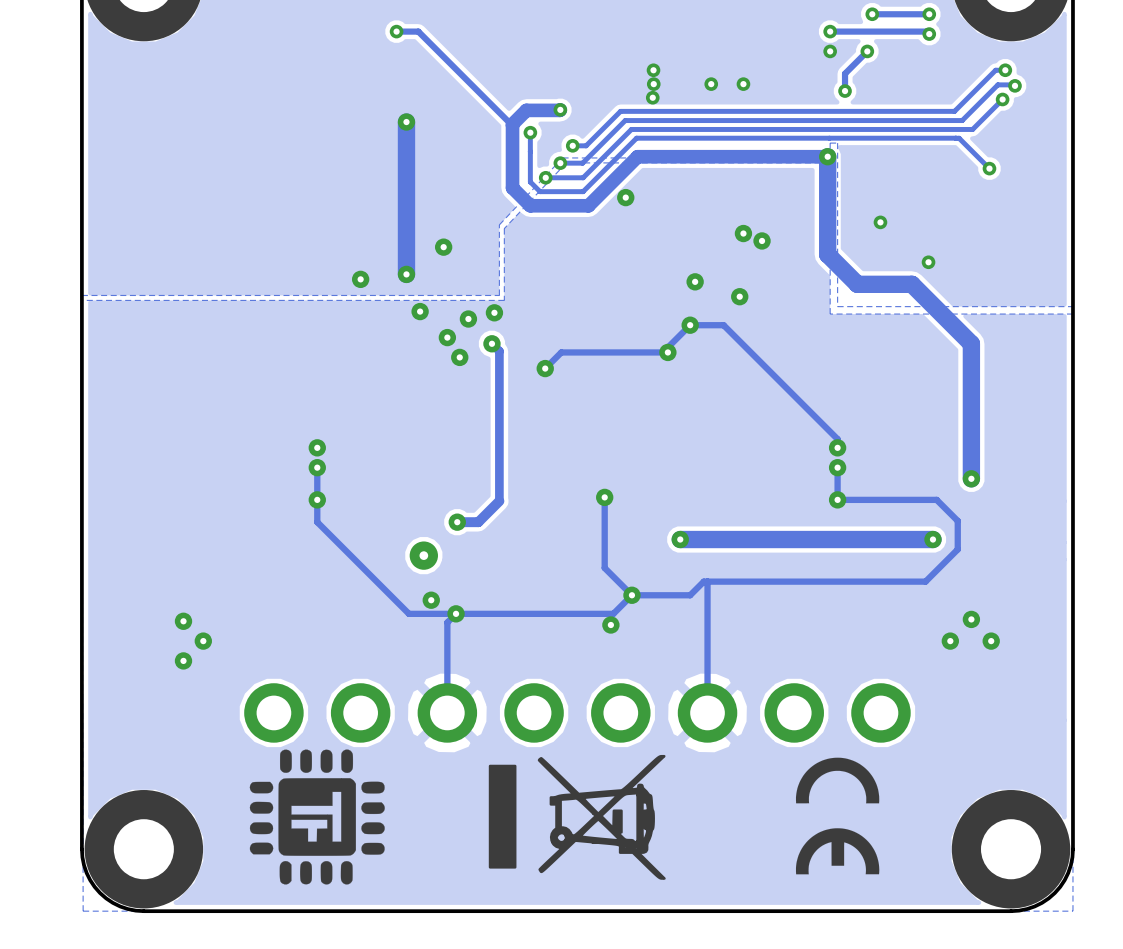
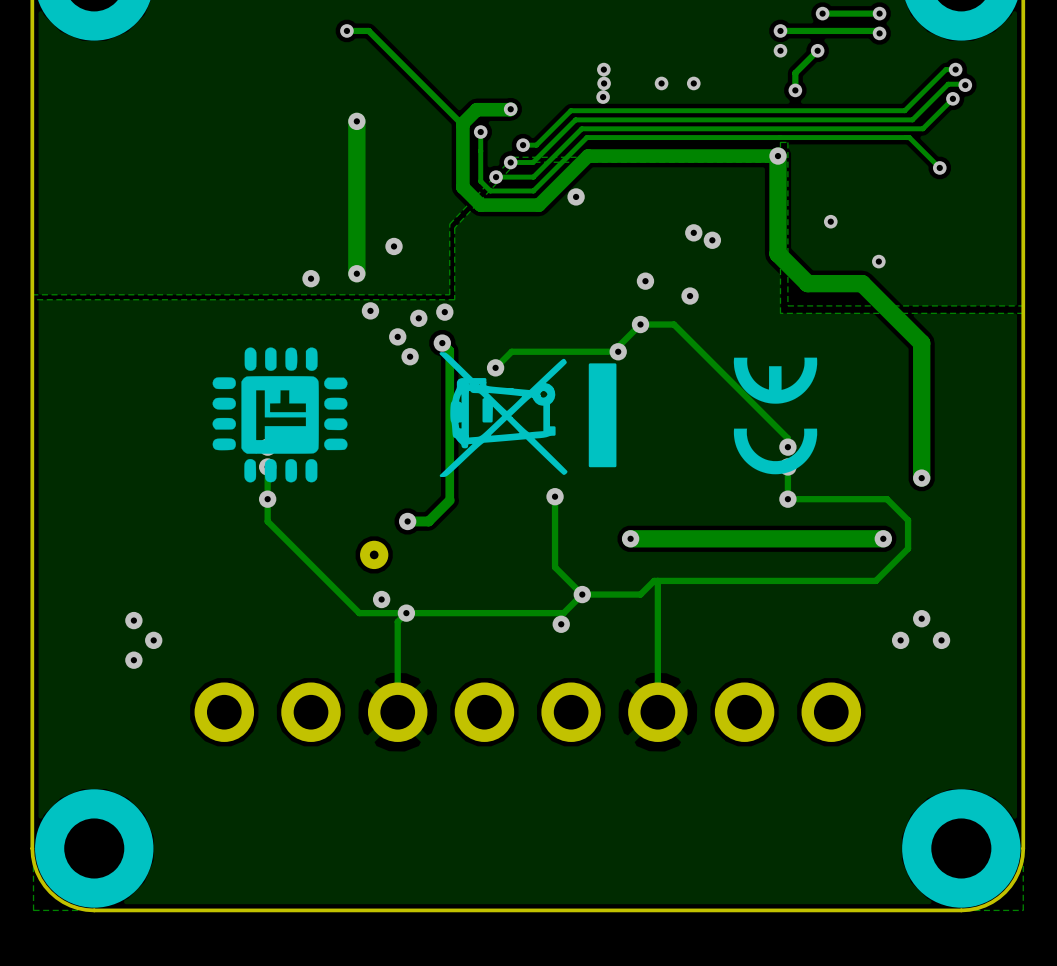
drawing: none -> [212, 347, 348, 483]
drawing: none -> [439, 352, 617, 478]
drawing: none -> [733, 357, 818, 475]
drawing: [249, 749, 385, 885] -> none
drawing: [488, 754, 666, 880] -> none
drawing: [795, 757, 880, 875] -> none

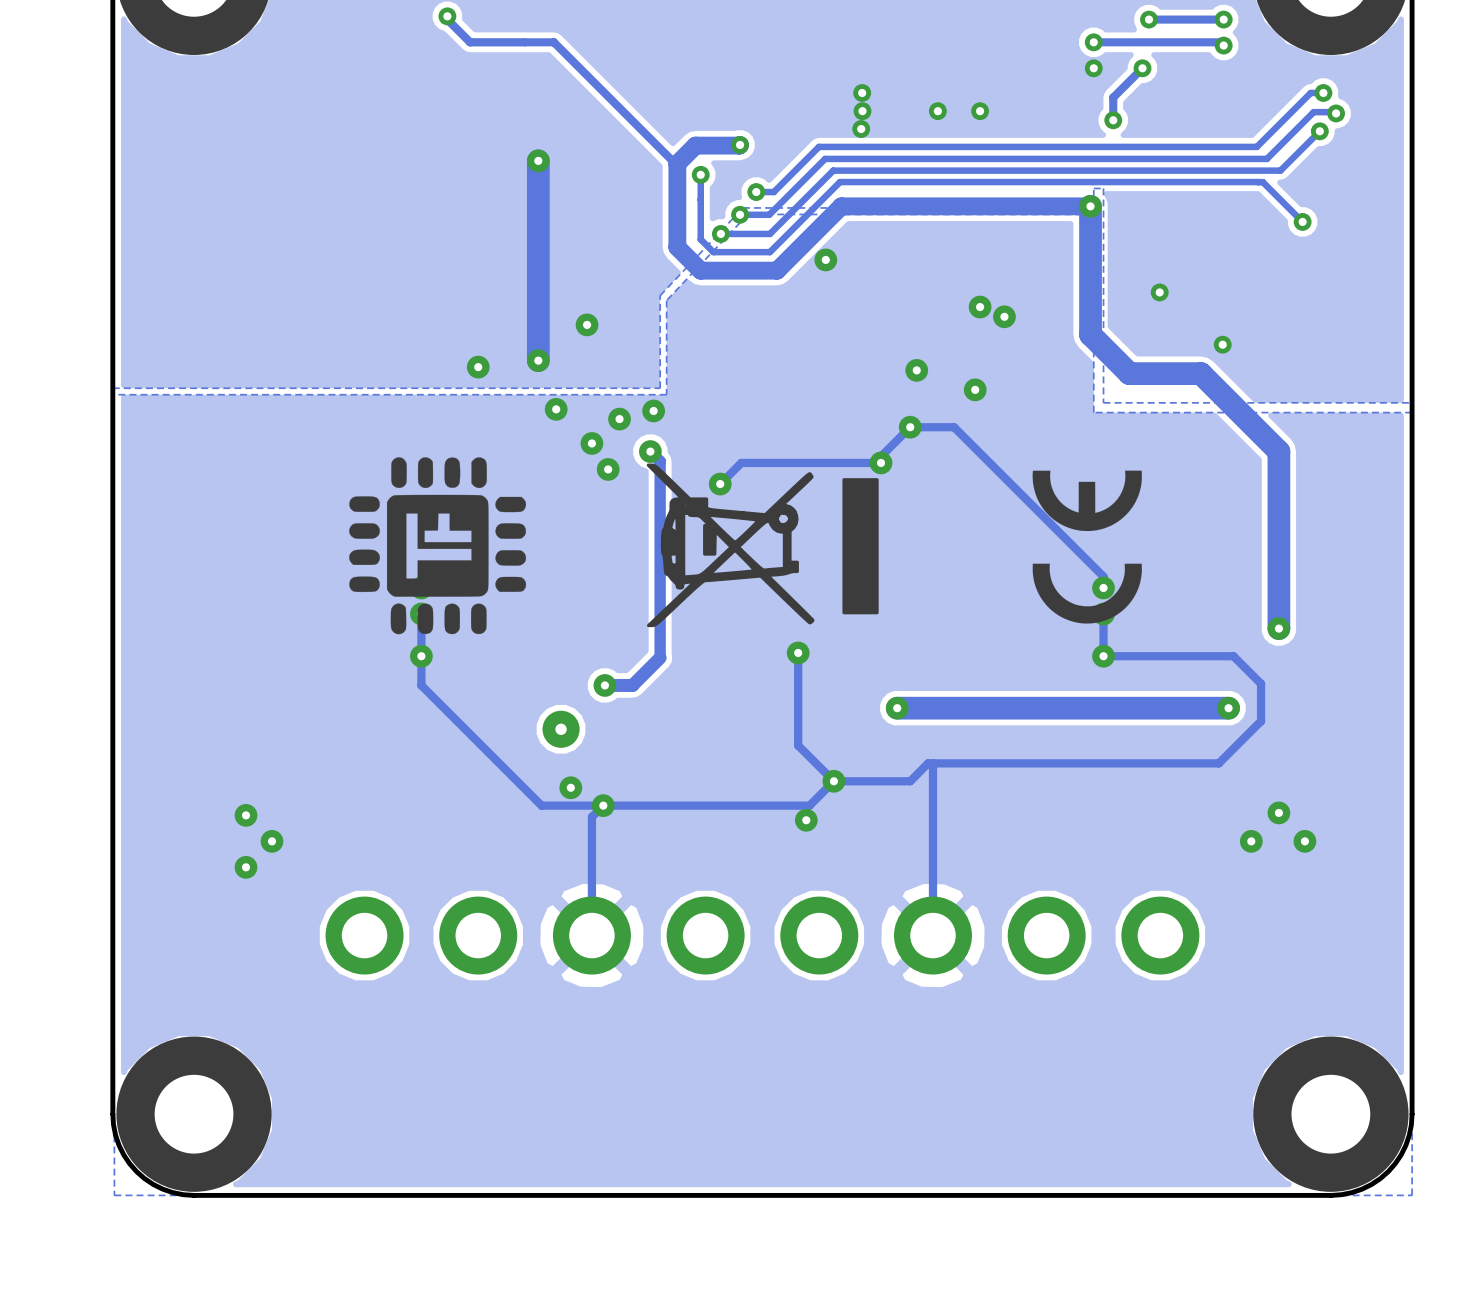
track: none -> (447, 16) (447, 19) (470, 42) (525, 42)
via position: (346, 30) -> (447, 16)

